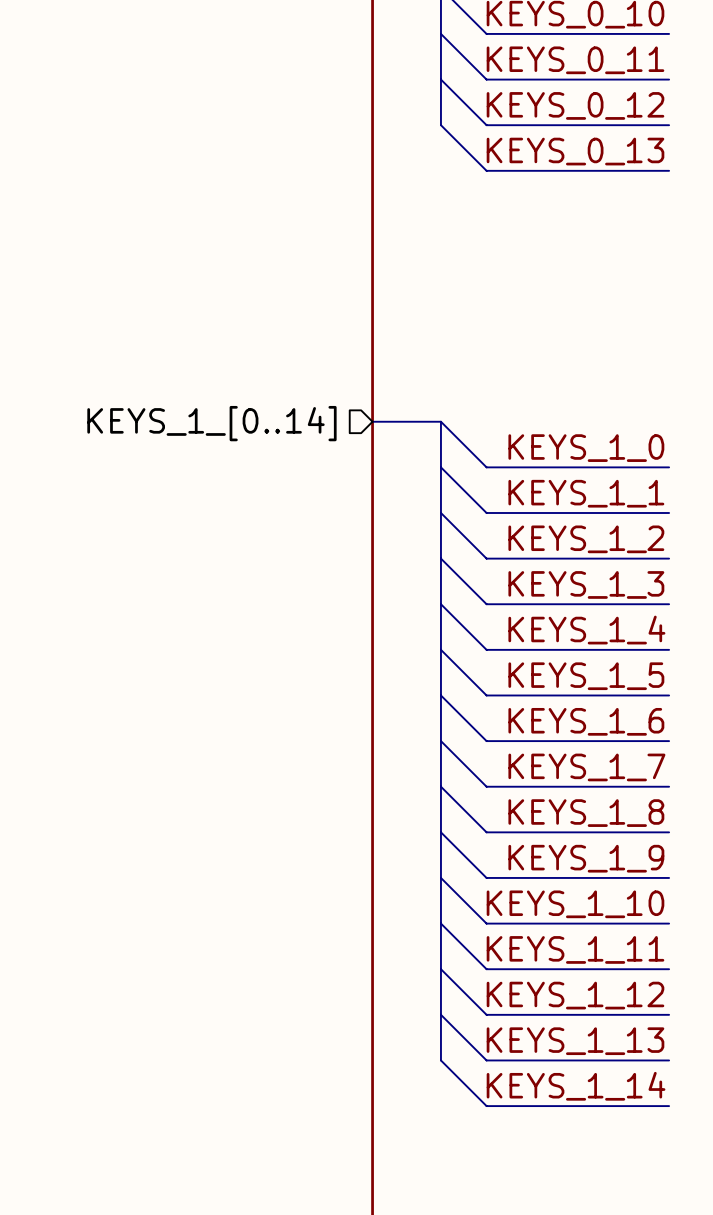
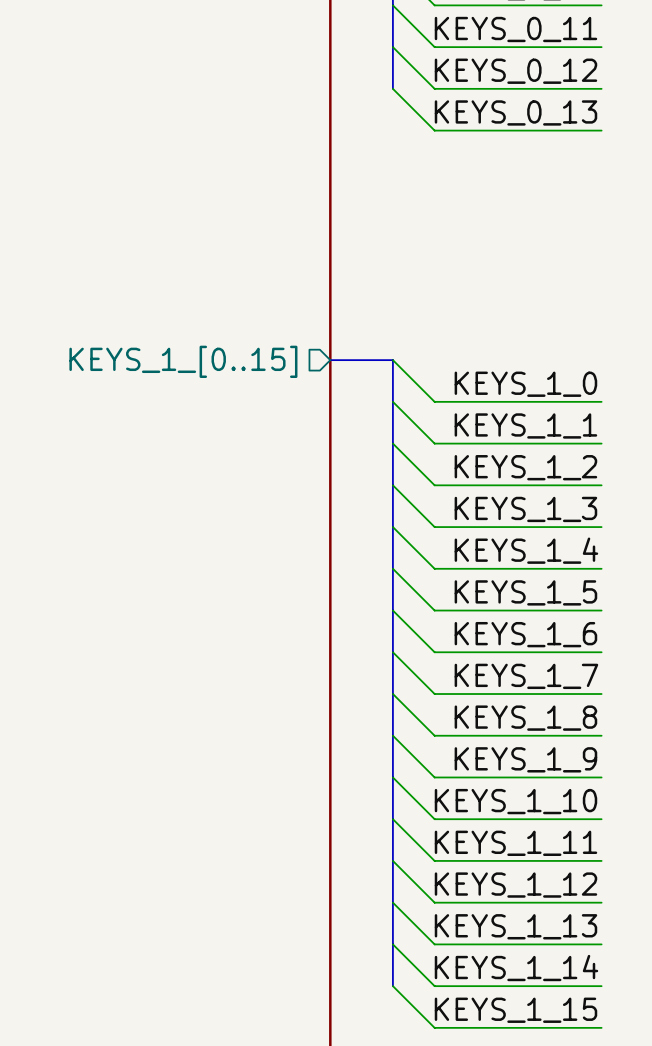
sheet pin: KEYS_1_[0..14] (211, 423) -> KEYS_1_[0..15] (183, 361)
bus: none -> (392, 944) (392, 986)
wire: none -> (392, 986) (434, 1027) (601, 1027)
label: none -> KEYS_1_15 (515, 1010)

